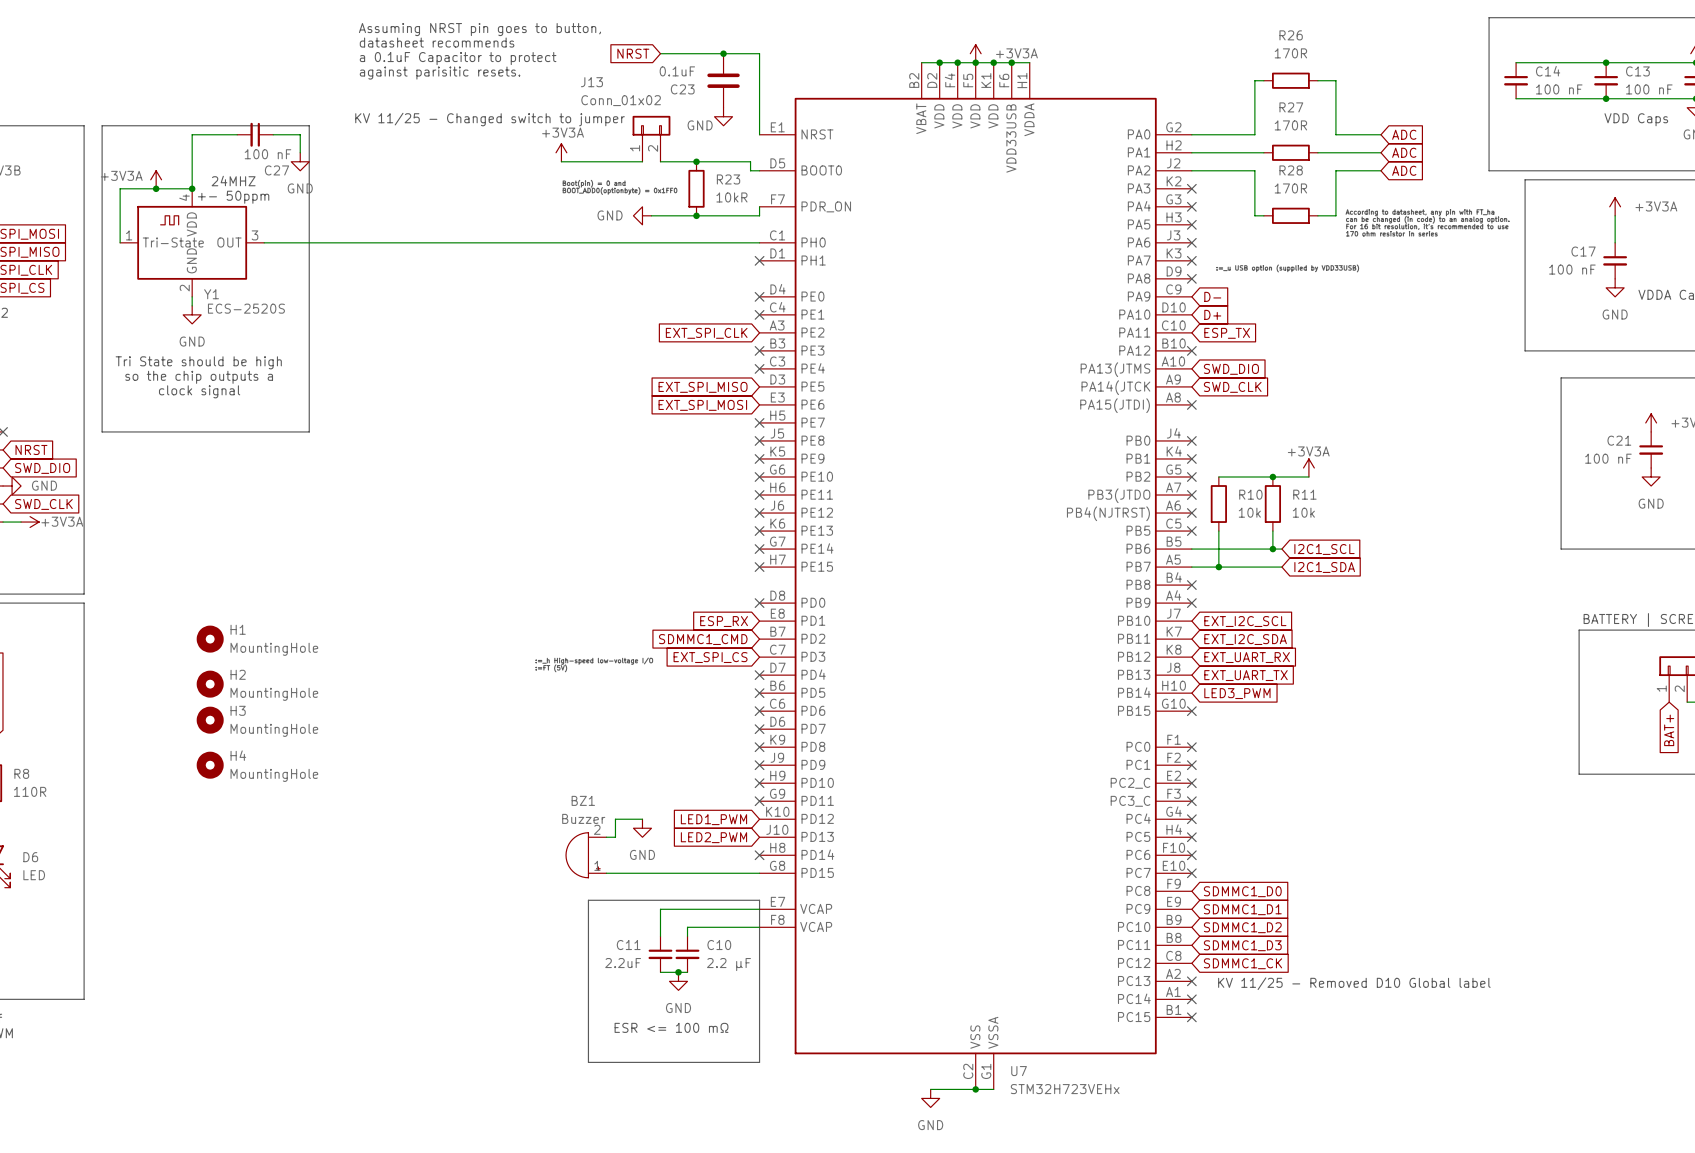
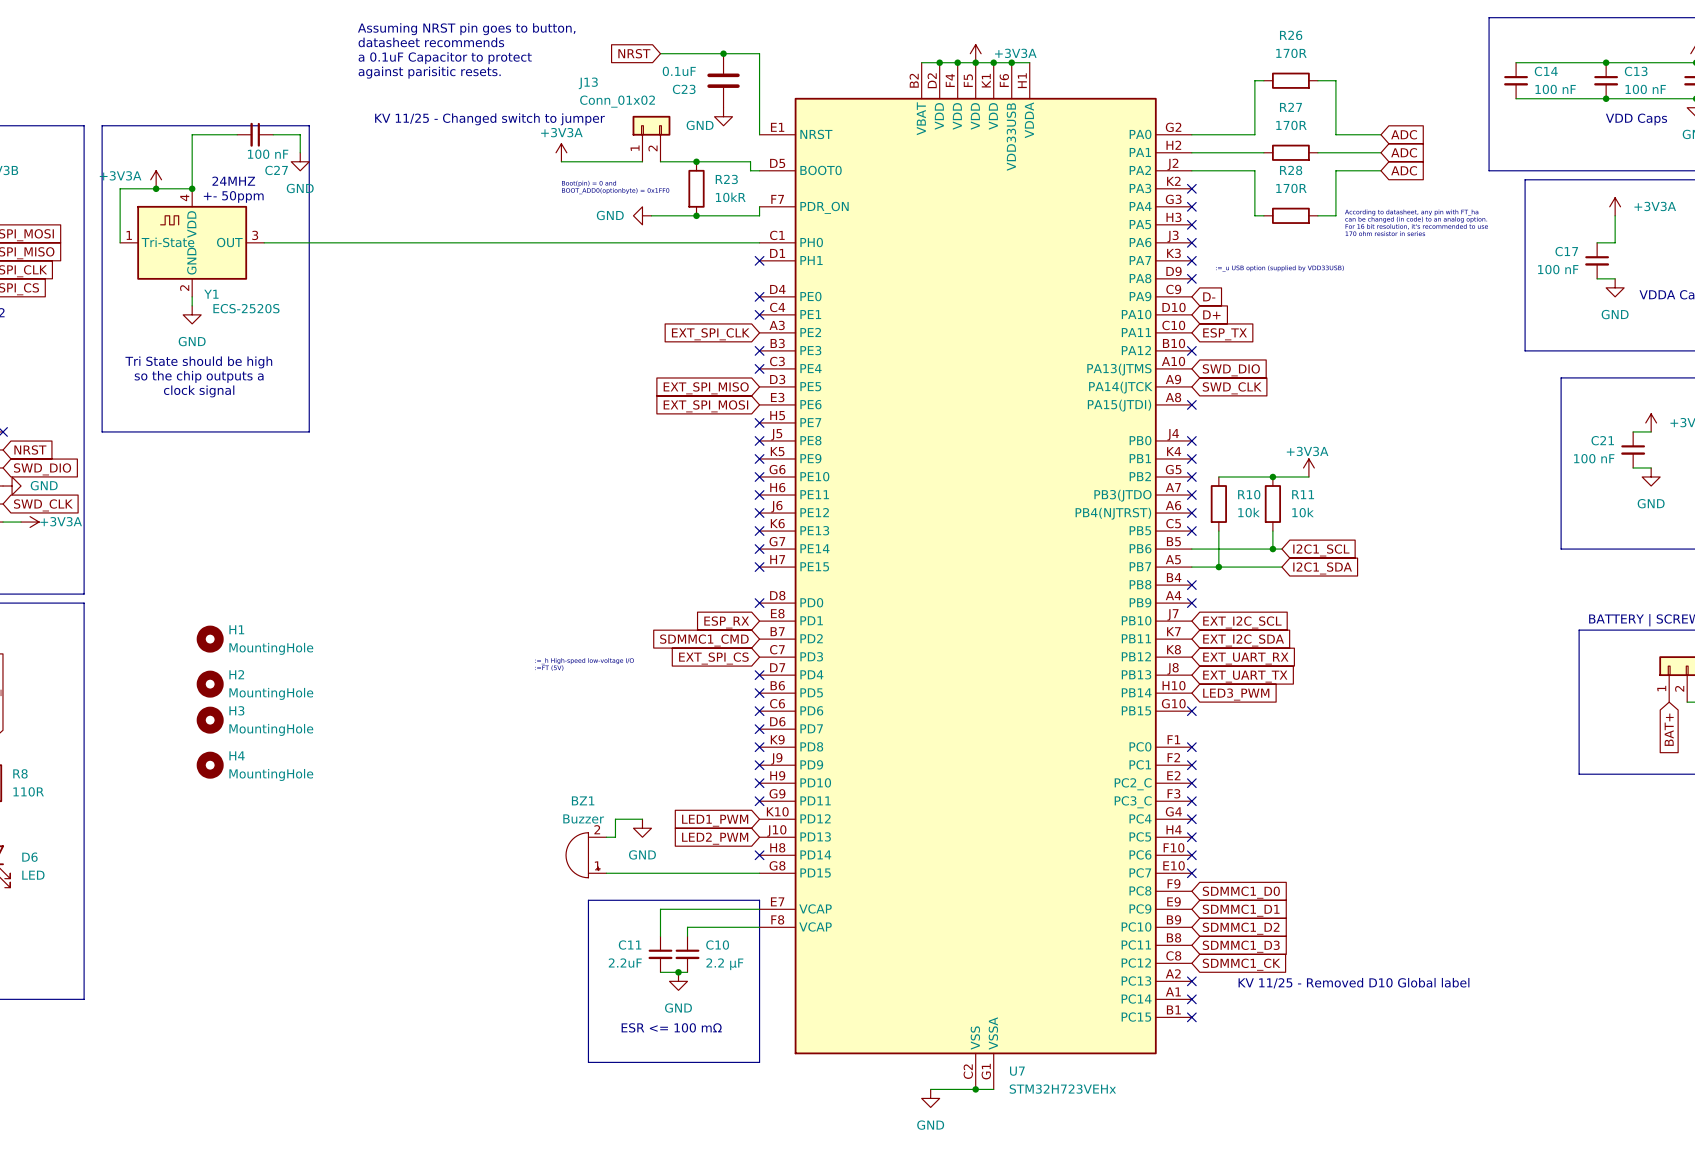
wire: none -> (1597, 242) (1615, 242)
C17 position: (1615, 260) -> (1597, 260)
wire: none -> (1597, 278) (1615, 278)
wire: none -> (1633, 431) (1651, 431)
C21 position: (1651, 449) -> (1633, 449)
wire: none -> (1633, 467) (1651, 467)

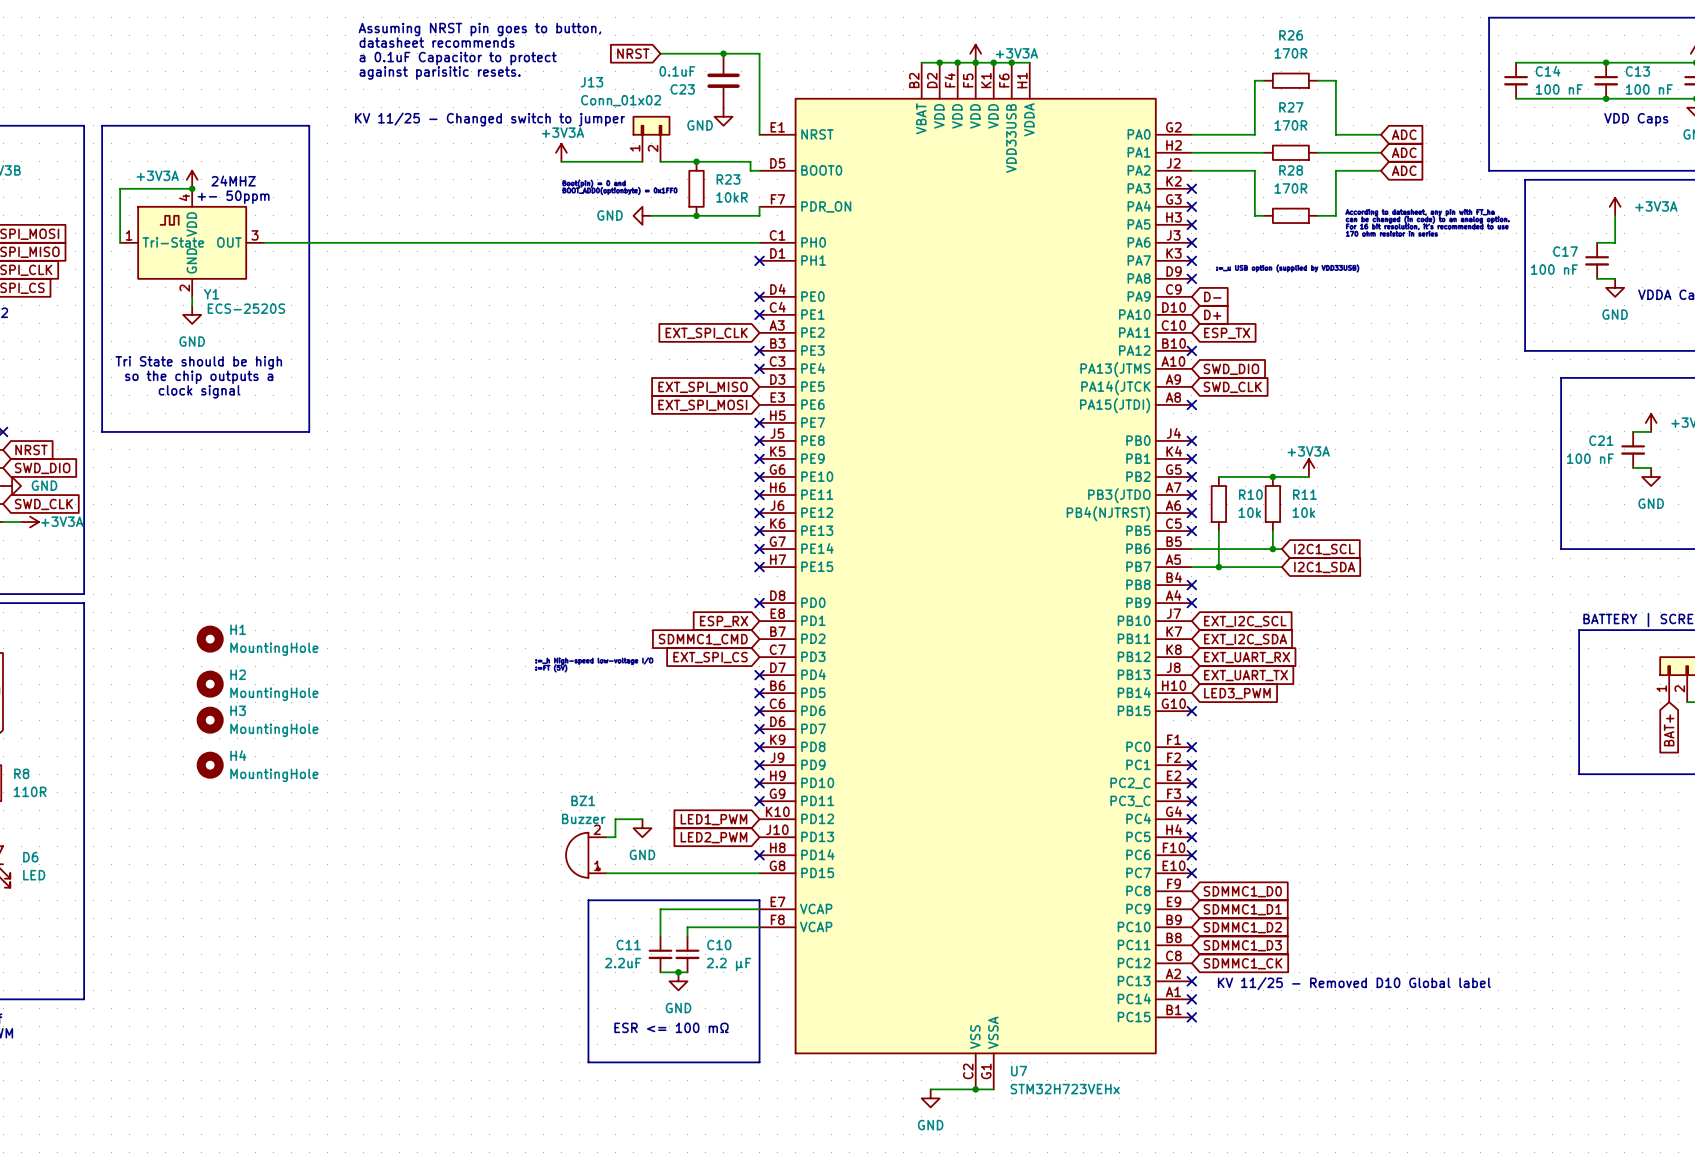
wire: (237, 134) (192, 134) (192, 188) -> none
C27: 100 nF (255, 134) -> none
wire: (273, 134) (300, 134) (300, 152) -> none
power symbol: GND (300, 161) -> none
power symbol position: +3V3A (156, 179) -> +3V3A (192, 179)
junction: (156, 188) -> none

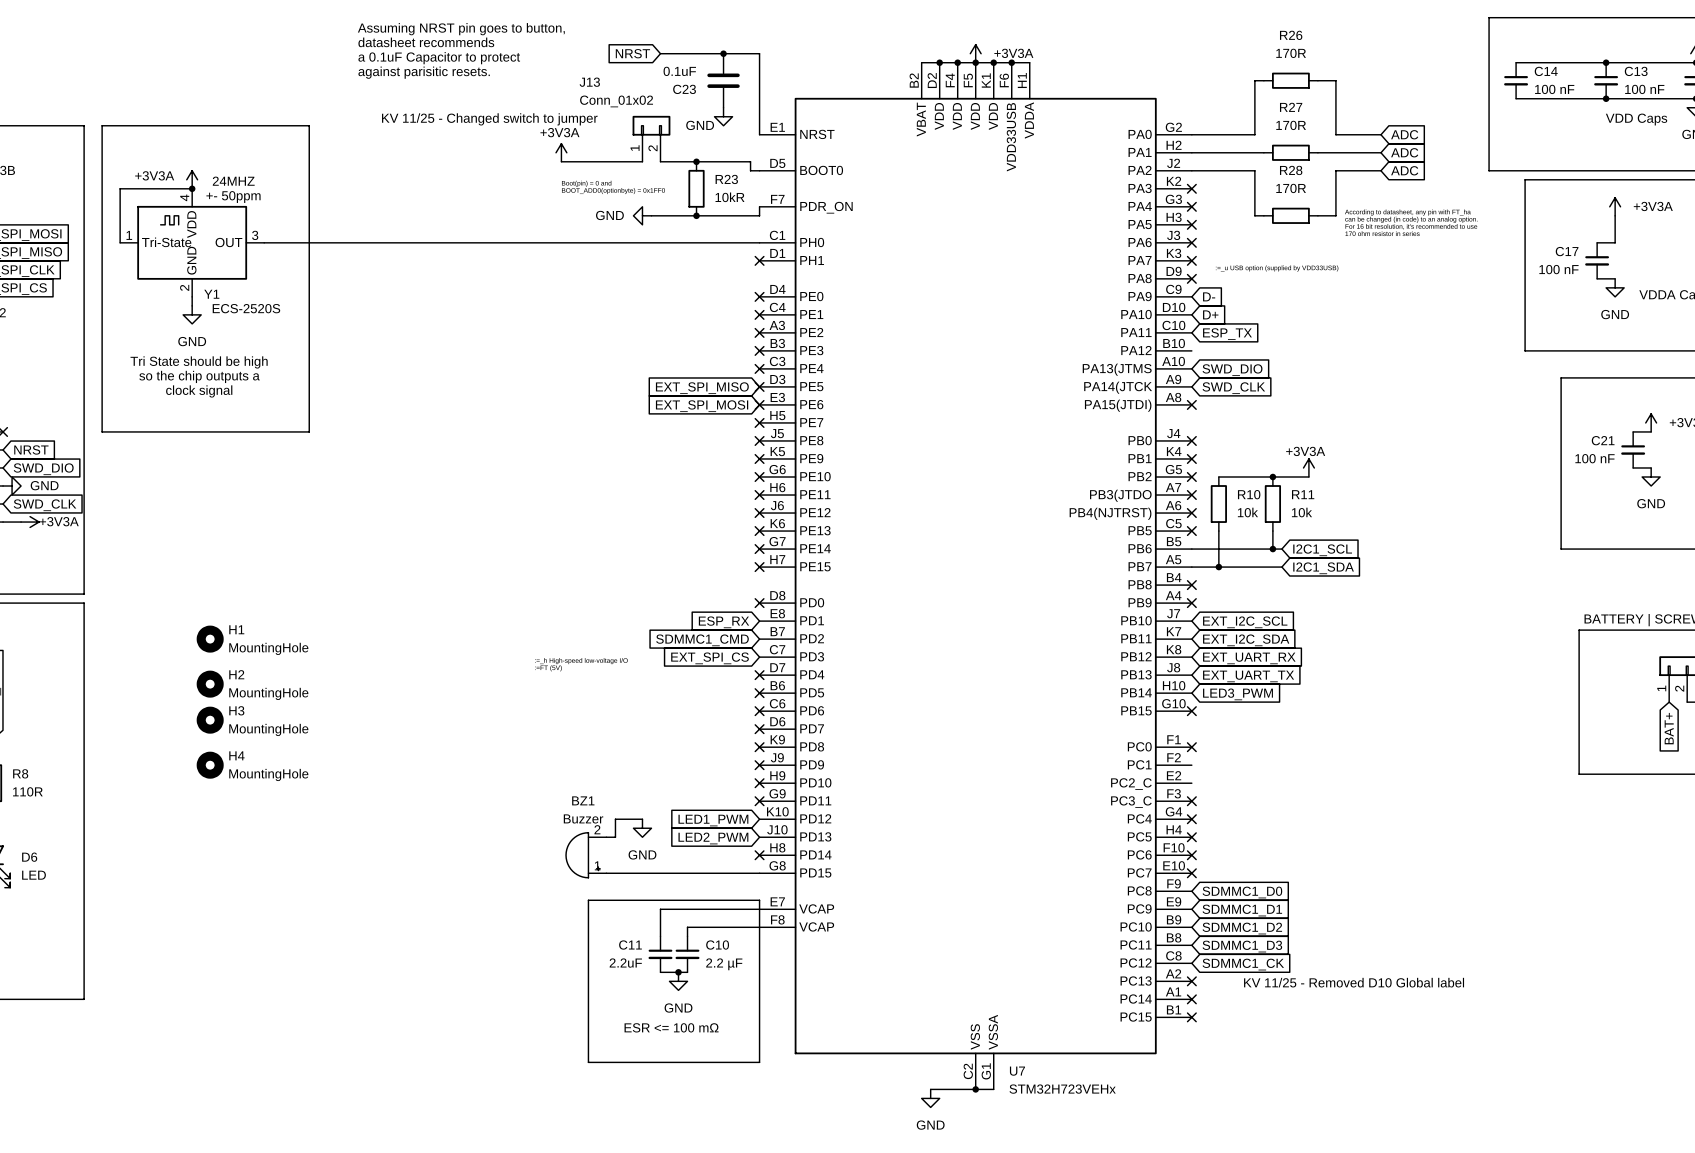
no-connect mark: none -> (759, 332)
global label: EXT_SPI_CLK (706, 333) -> none
no-connect mark: (1191, 350) -> none
no-connect mark: none -> (759, 386)
no-connect mark: none -> (759, 404)
no-connect mark: (1191, 765) -> none
no-connect mark: (1191, 783) -> none

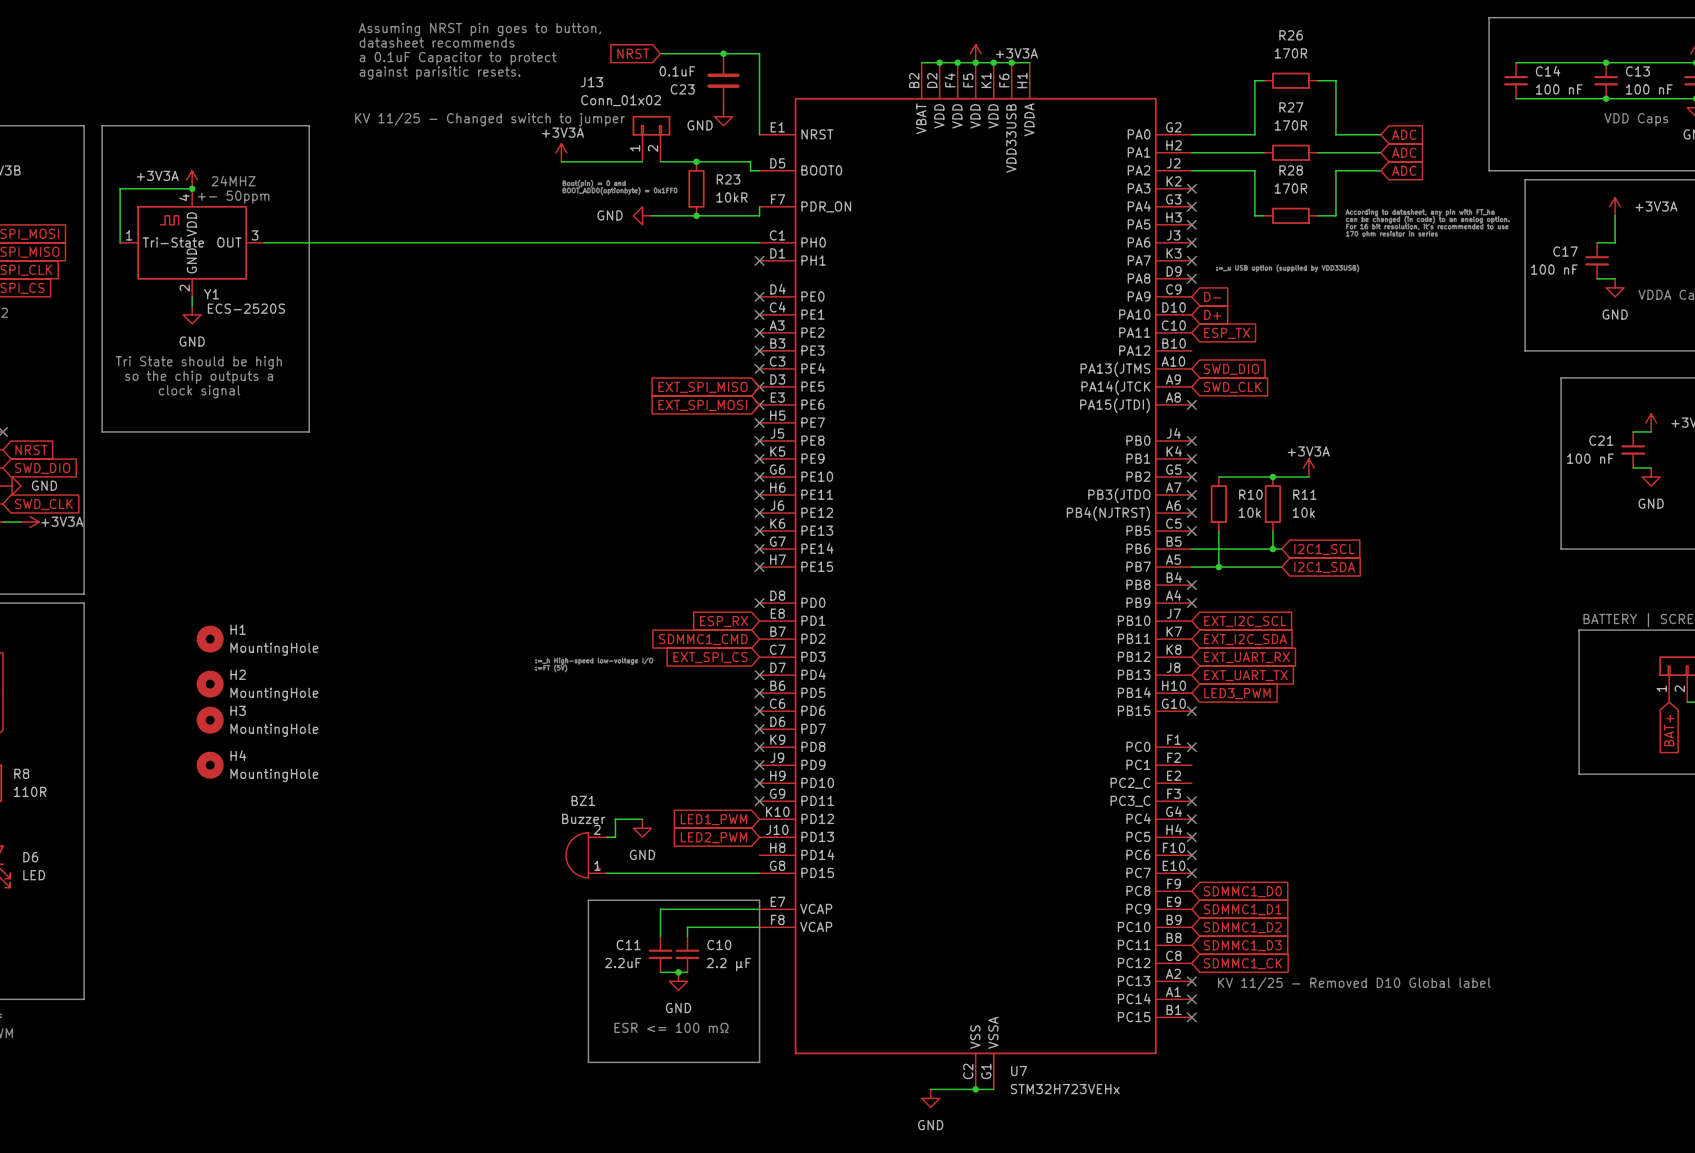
no-connect mark: (759, 855) -> none

